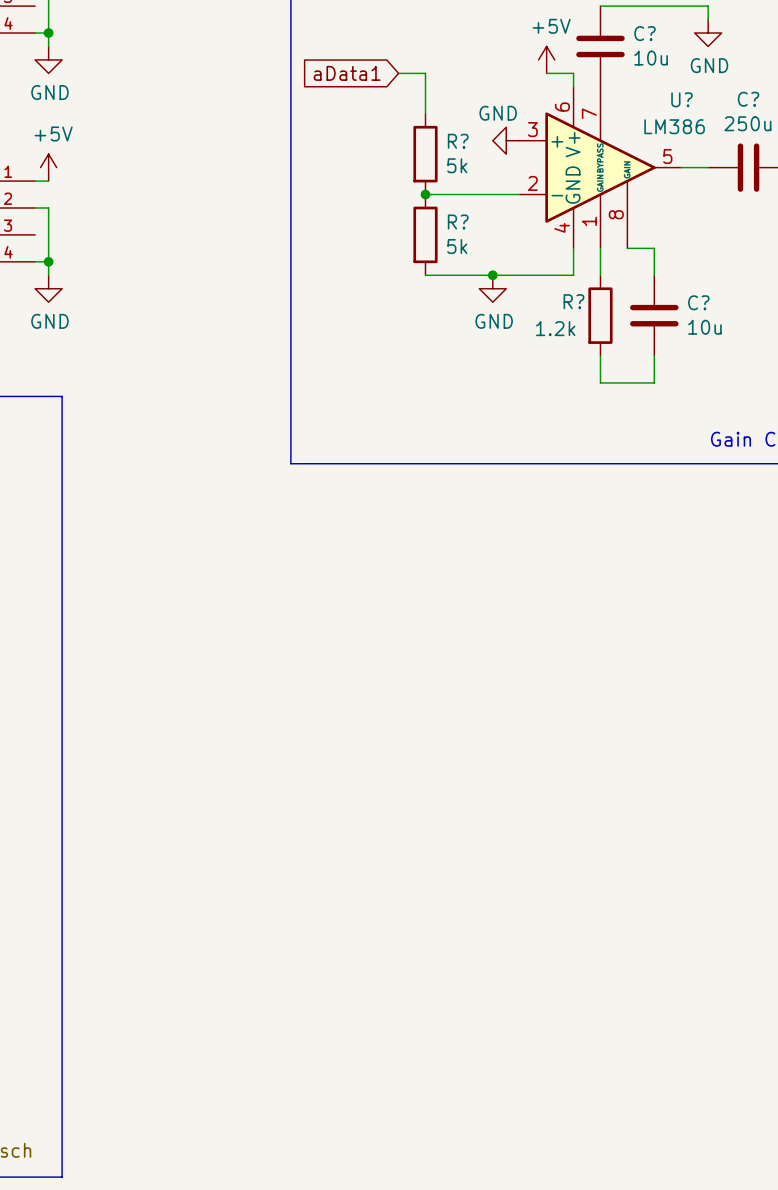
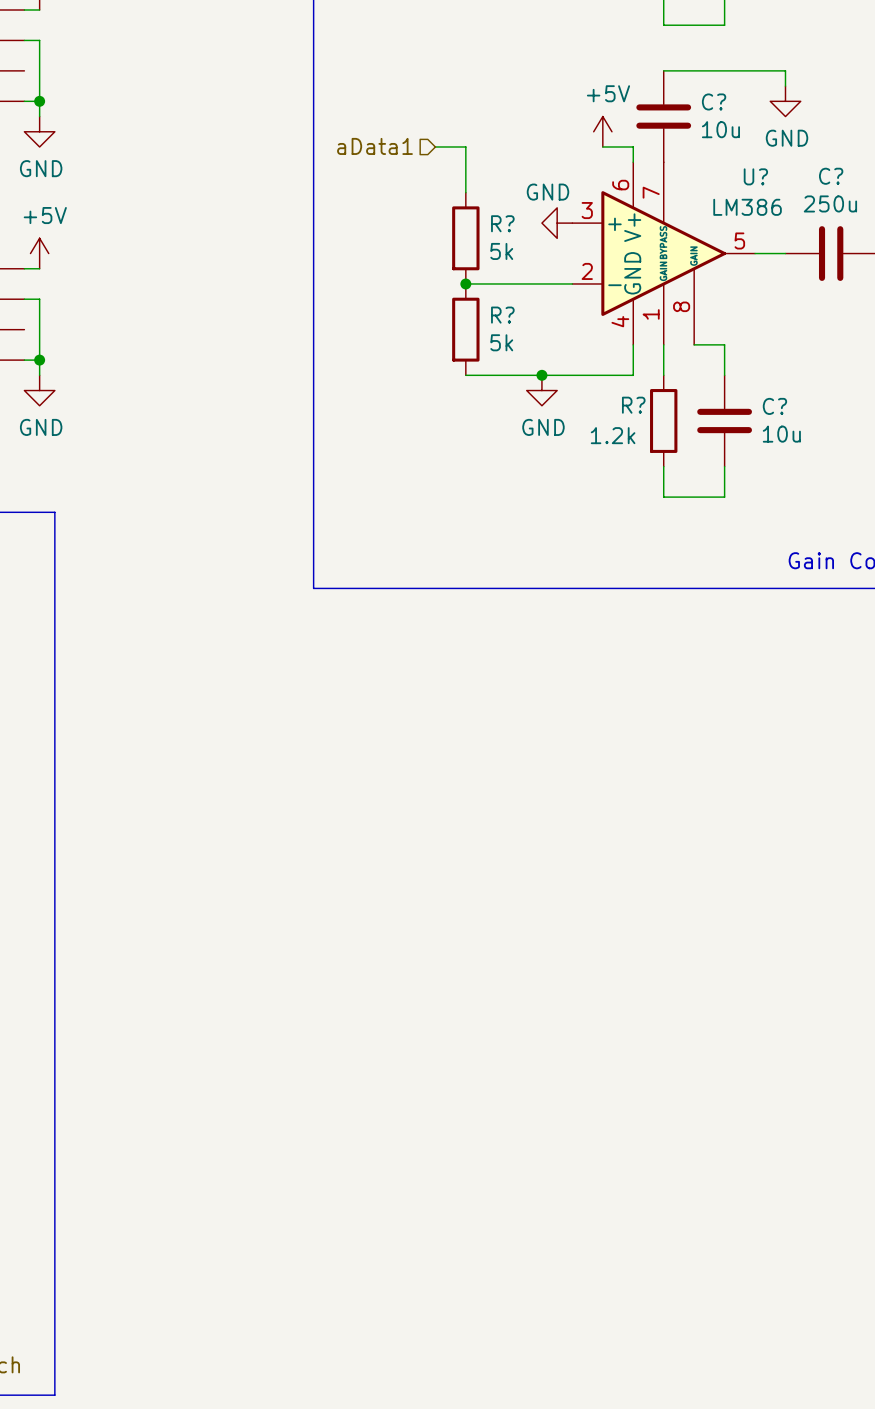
hierarchical label: none -> aData1 (374, 146)
global label: aData1 (347, 73) -> none

